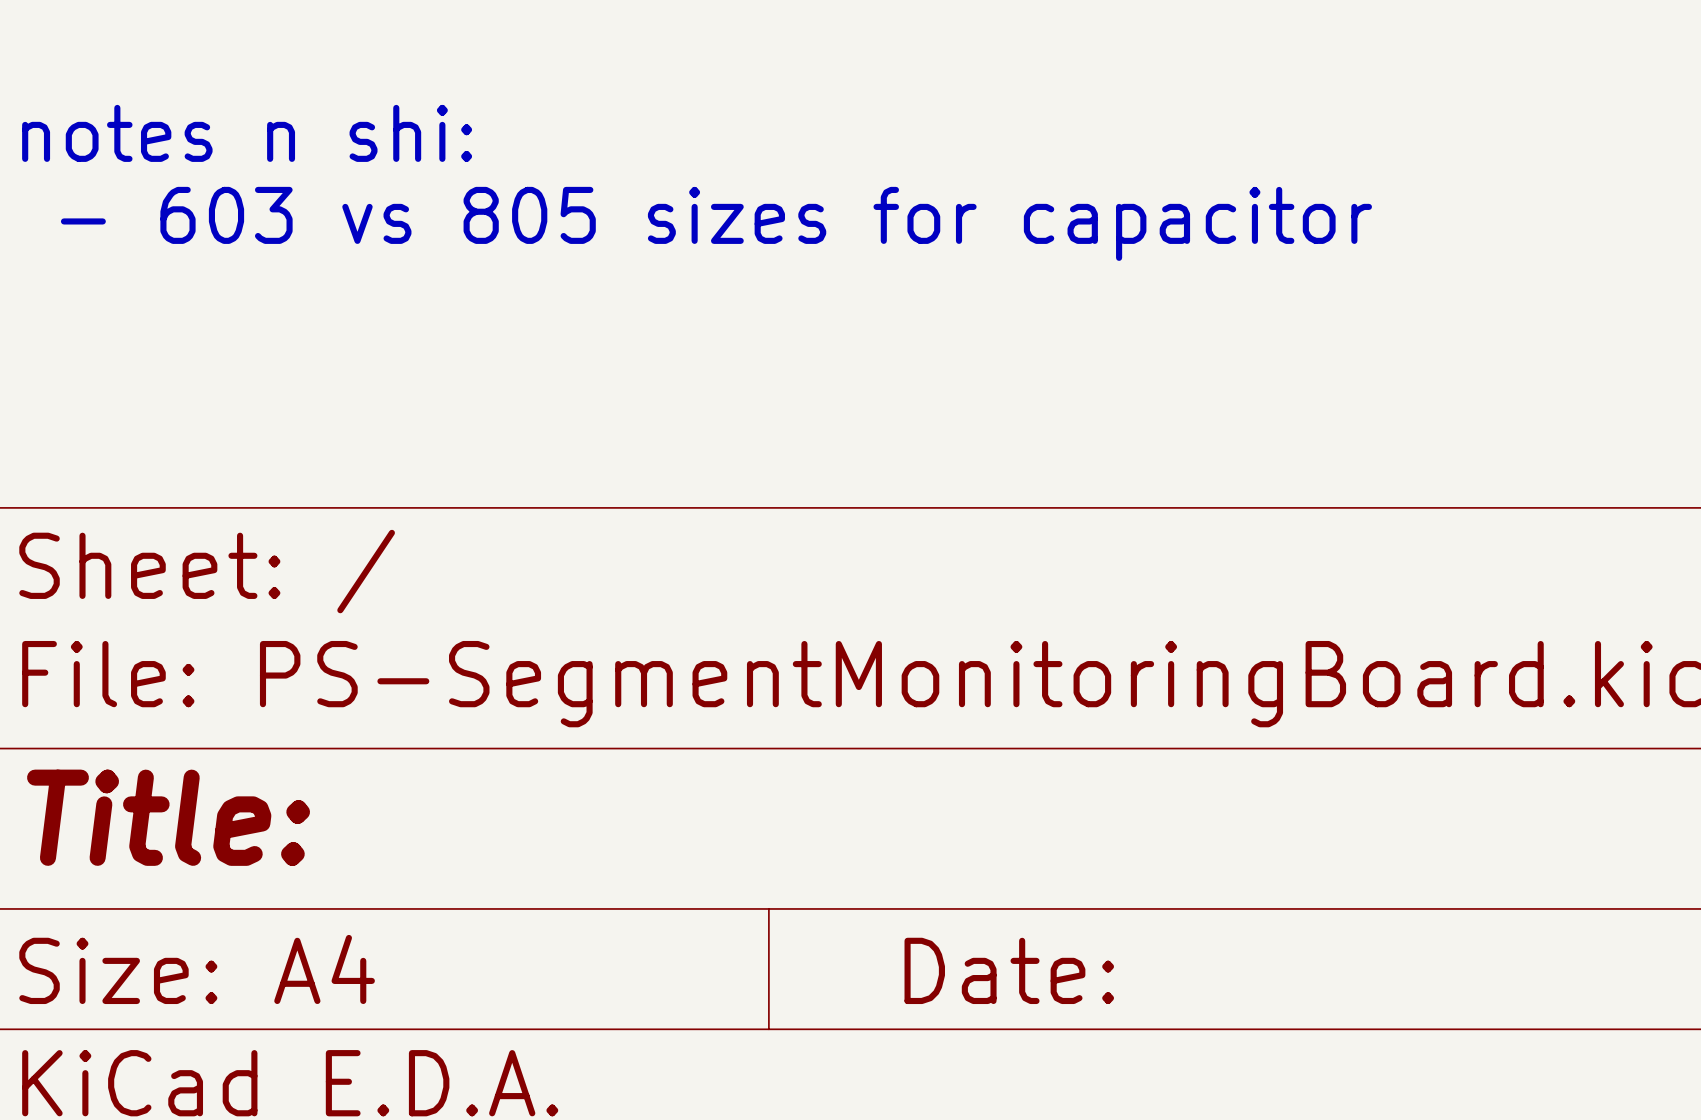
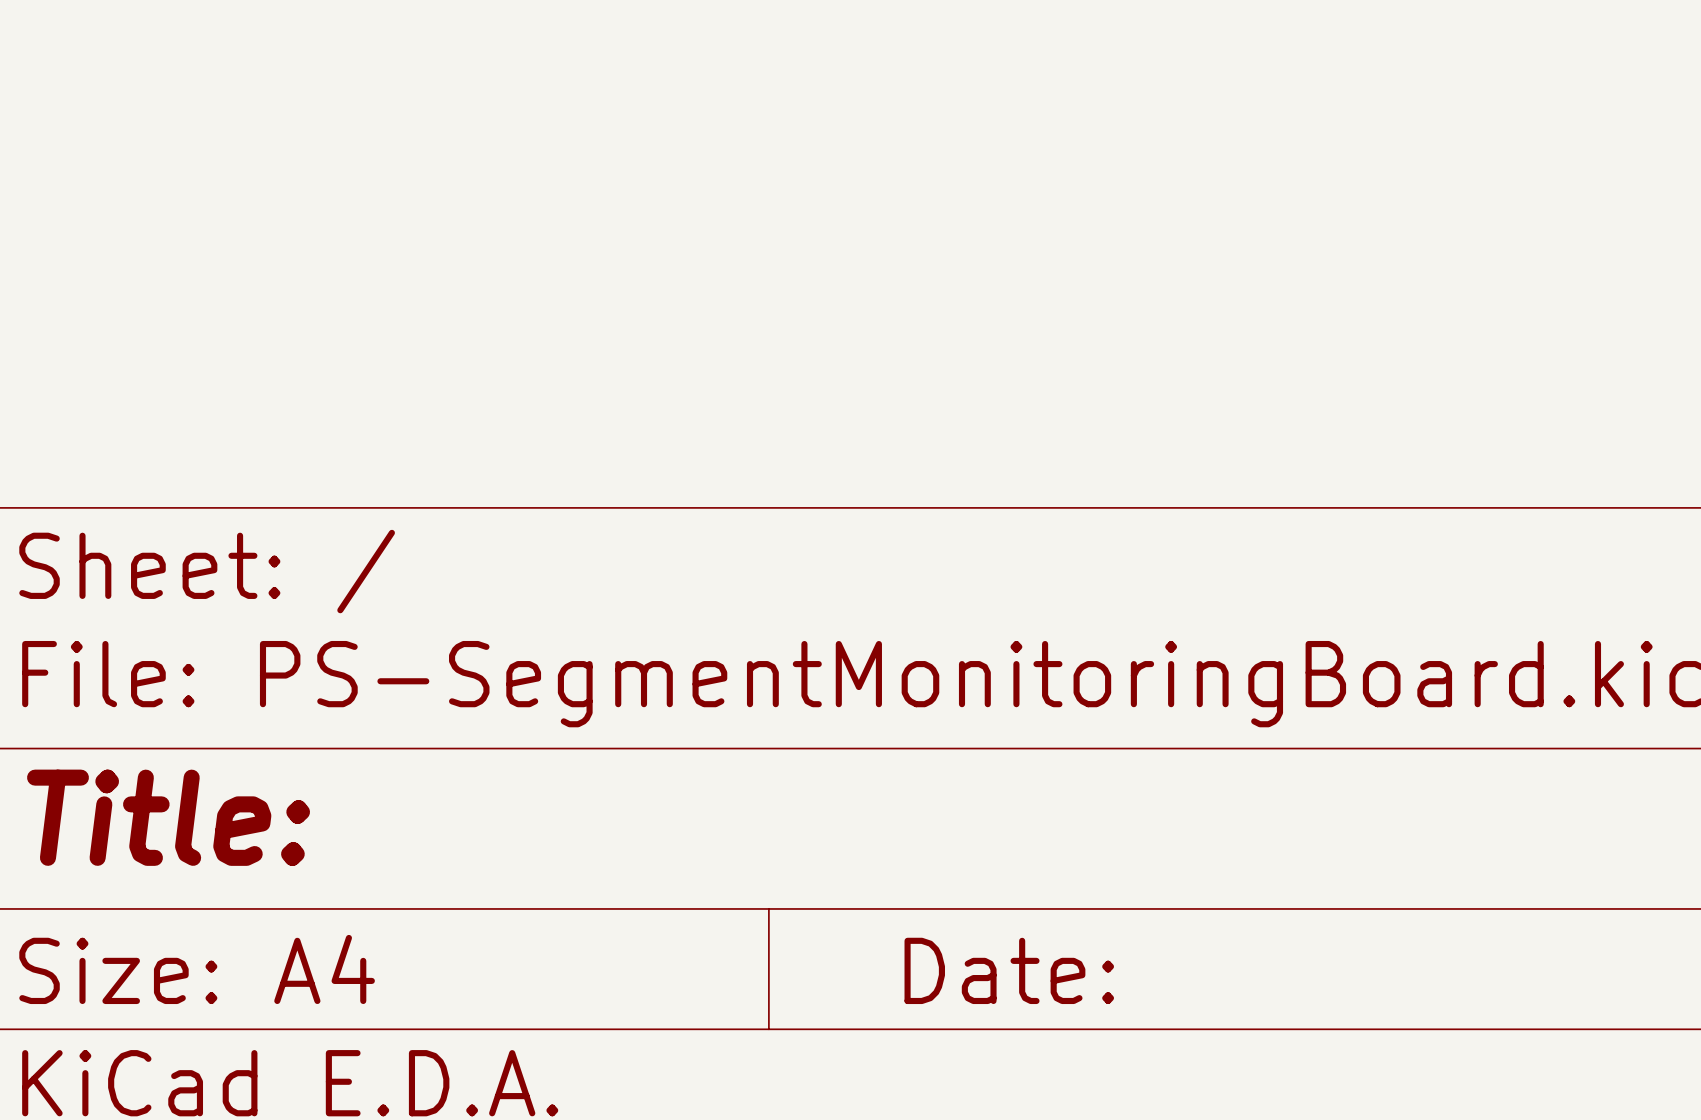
text: notes n shi: (247, 133) -> none
text: - 603 vs 805 sizes for capacitor (716, 223) -> none

